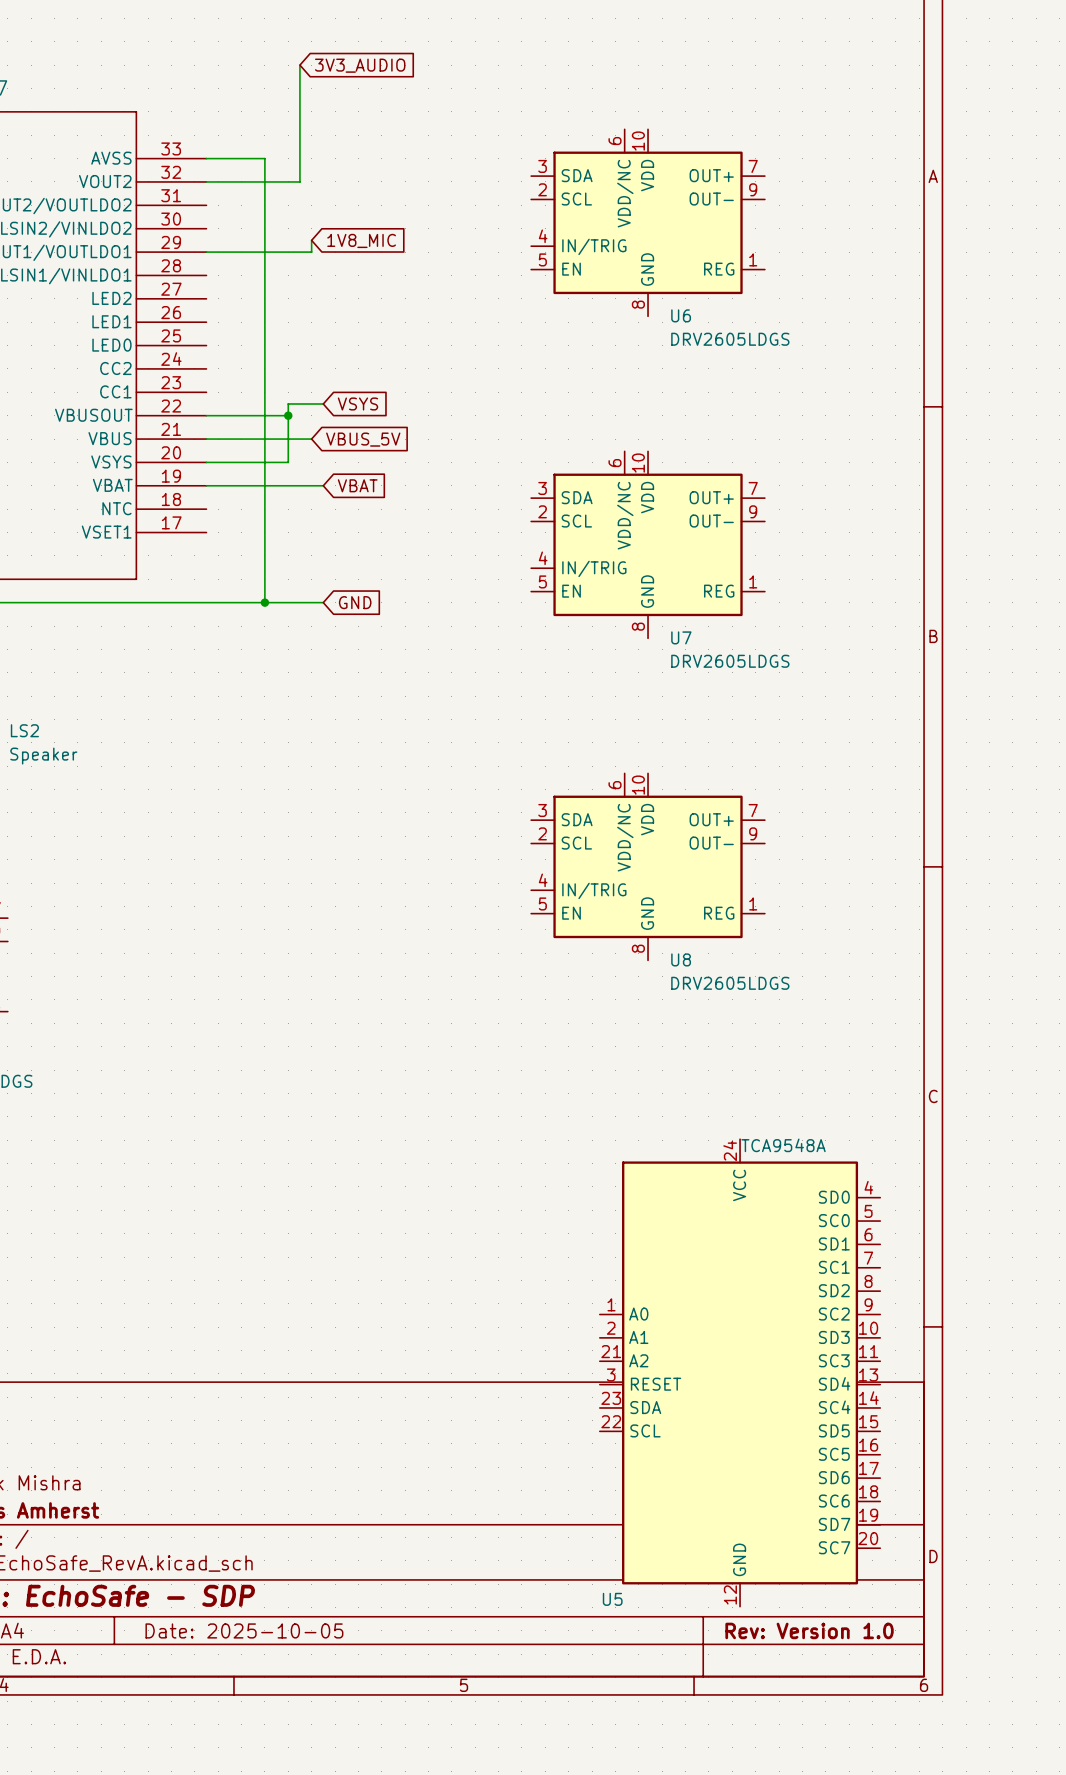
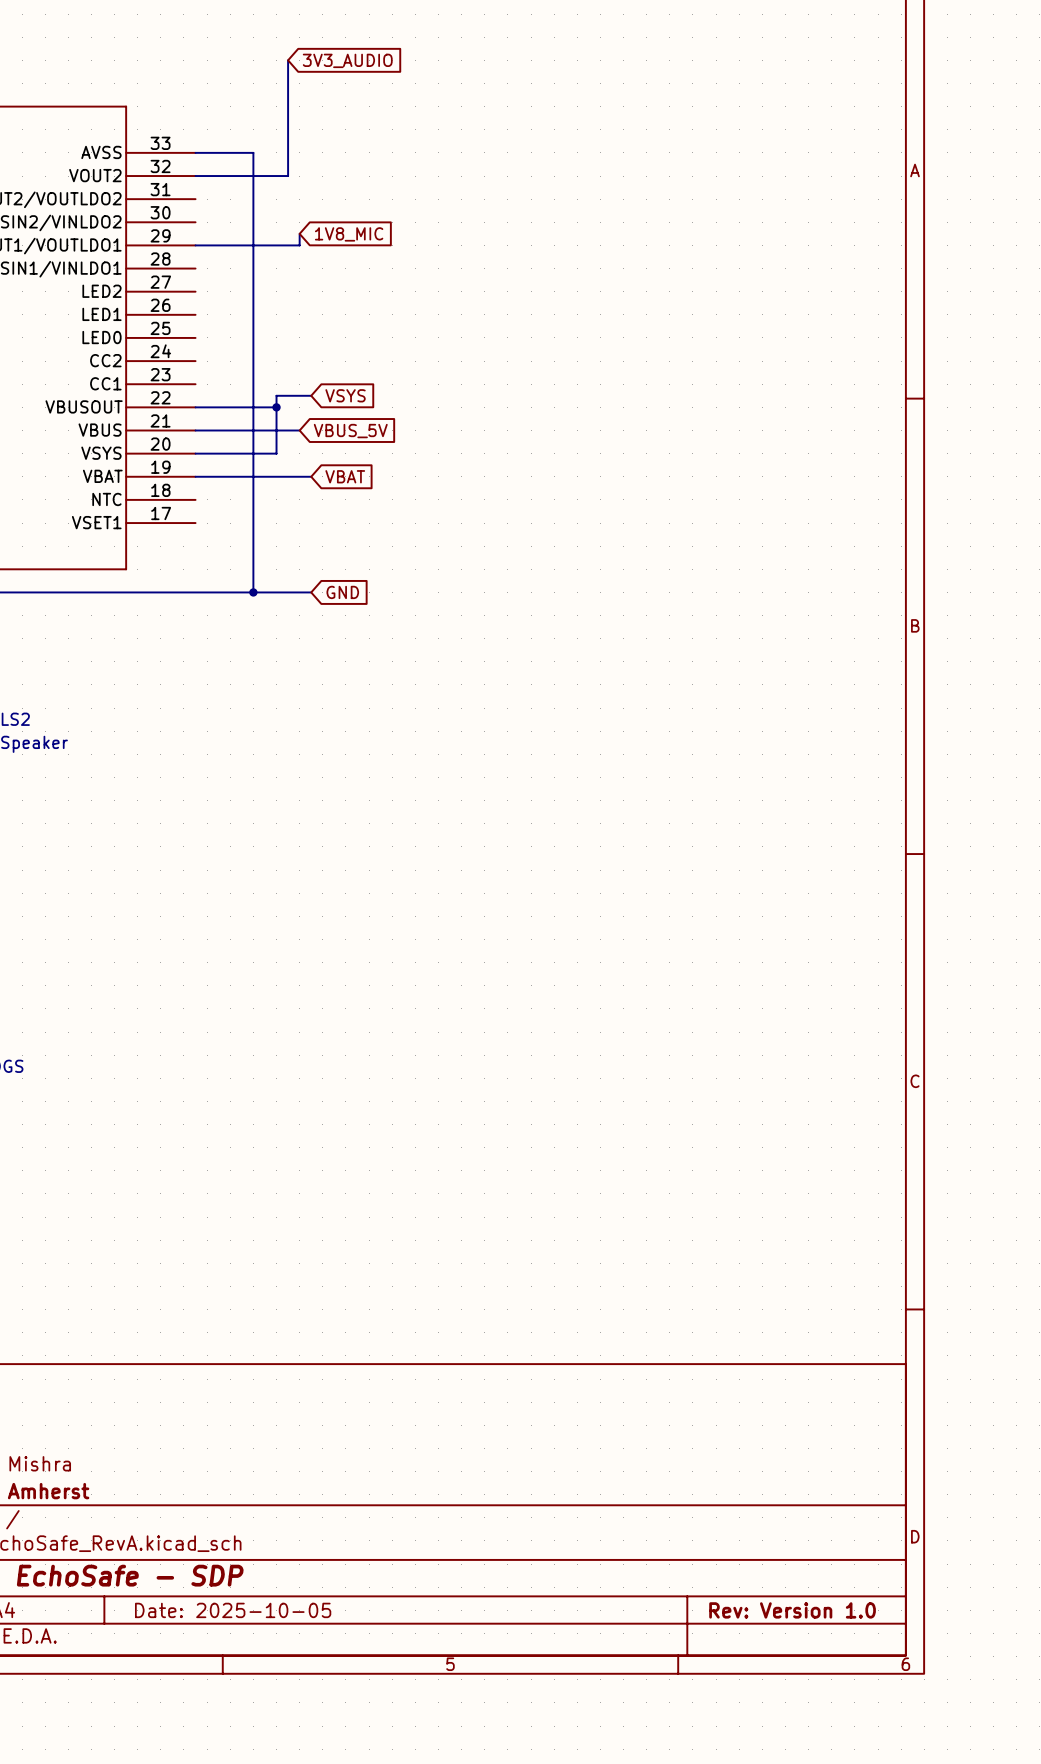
U6: DRV2605LDGS (648, 222) -> none
U7: DRV2605LDGS (648, 544) -> none
U8: DRV2605LDGS (648, 866) -> none
U5: TCA9548A (740, 1372) -> none

